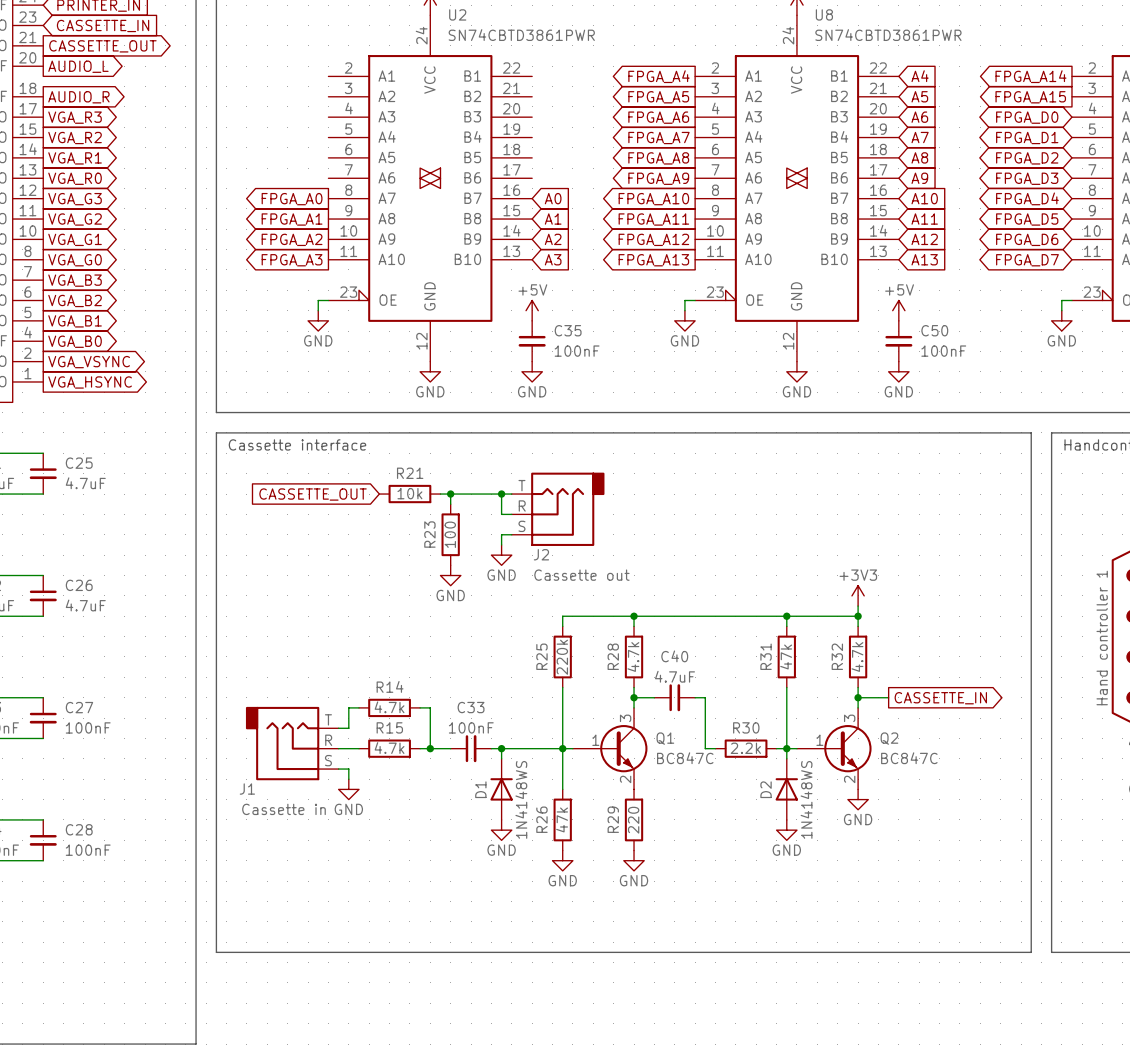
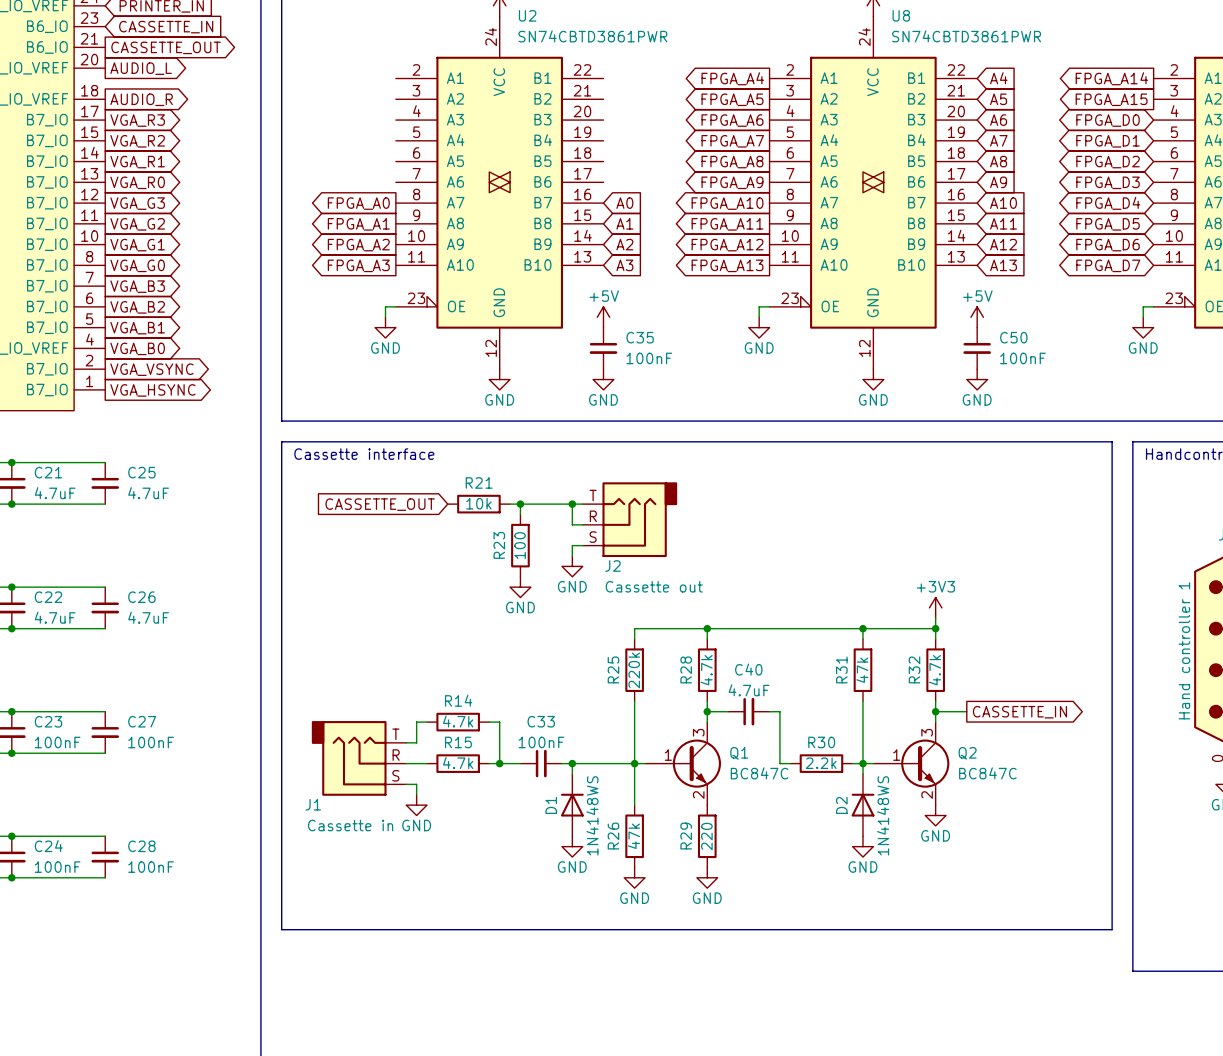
line: (216, 911) (216, 952) (1031, 952) (1031, 911) -> (281, 929) (1112, 929)

